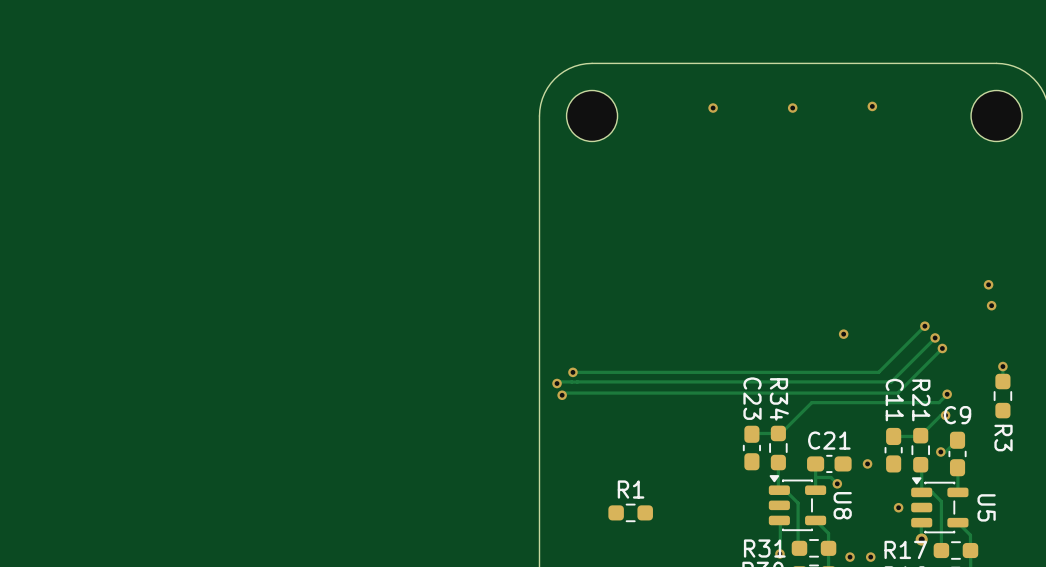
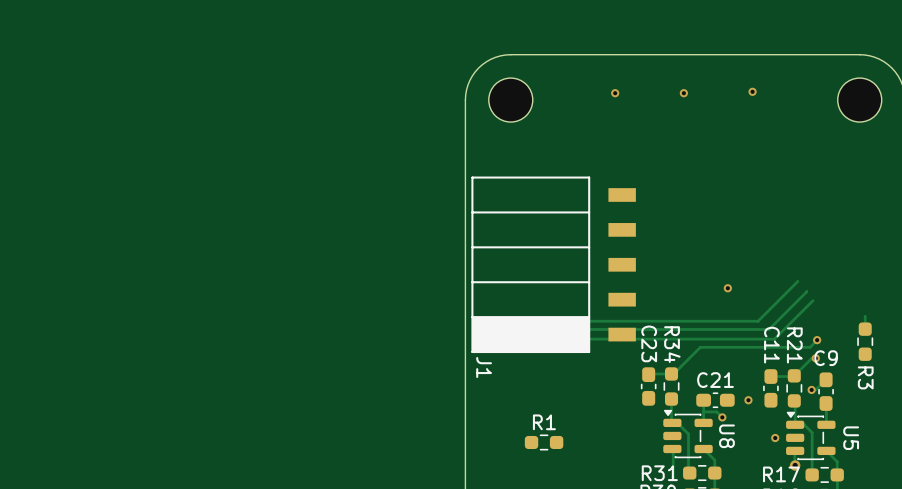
via: (988, 284) -> none
via: (991, 305) -> none
J1: none -> (553, 264)
via: (924, 326) -> none
via: (935, 337) -> none
via: (942, 348) -> none
via: (1002, 366) -> none
via: (779, 553) -> none
via: (850, 557) -> none
via: (870, 557) -> none

